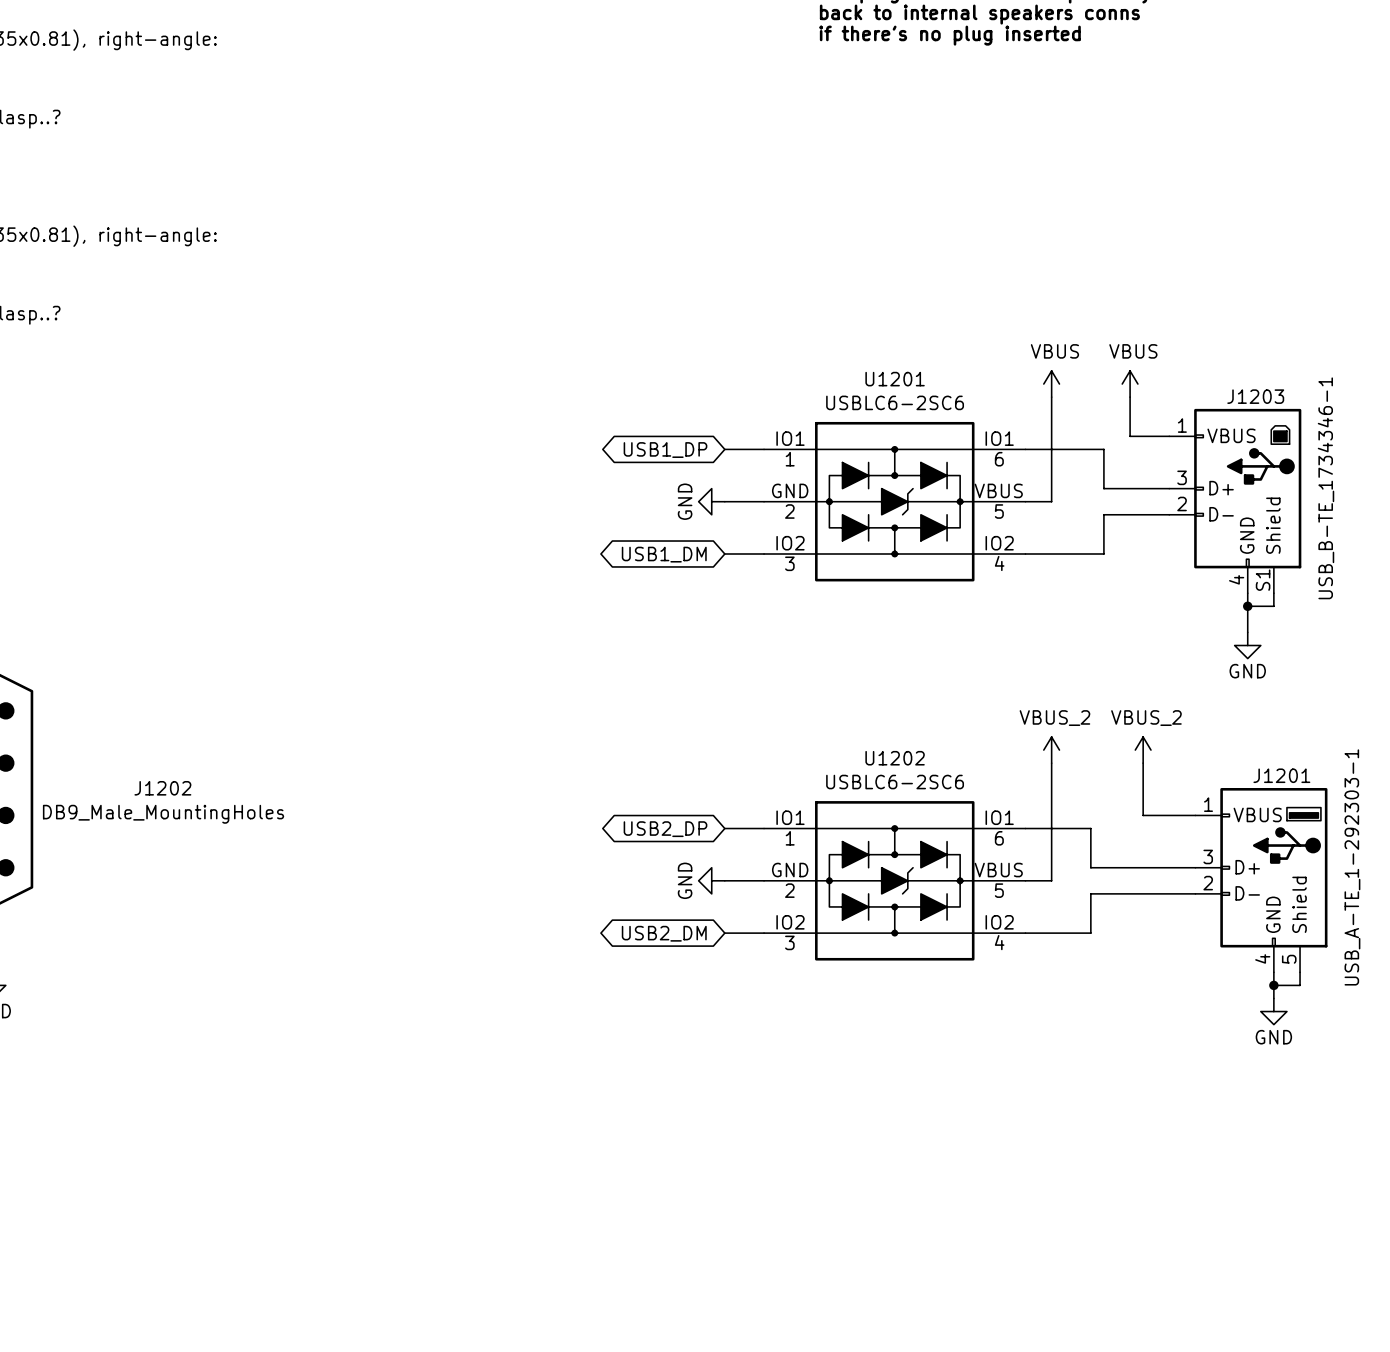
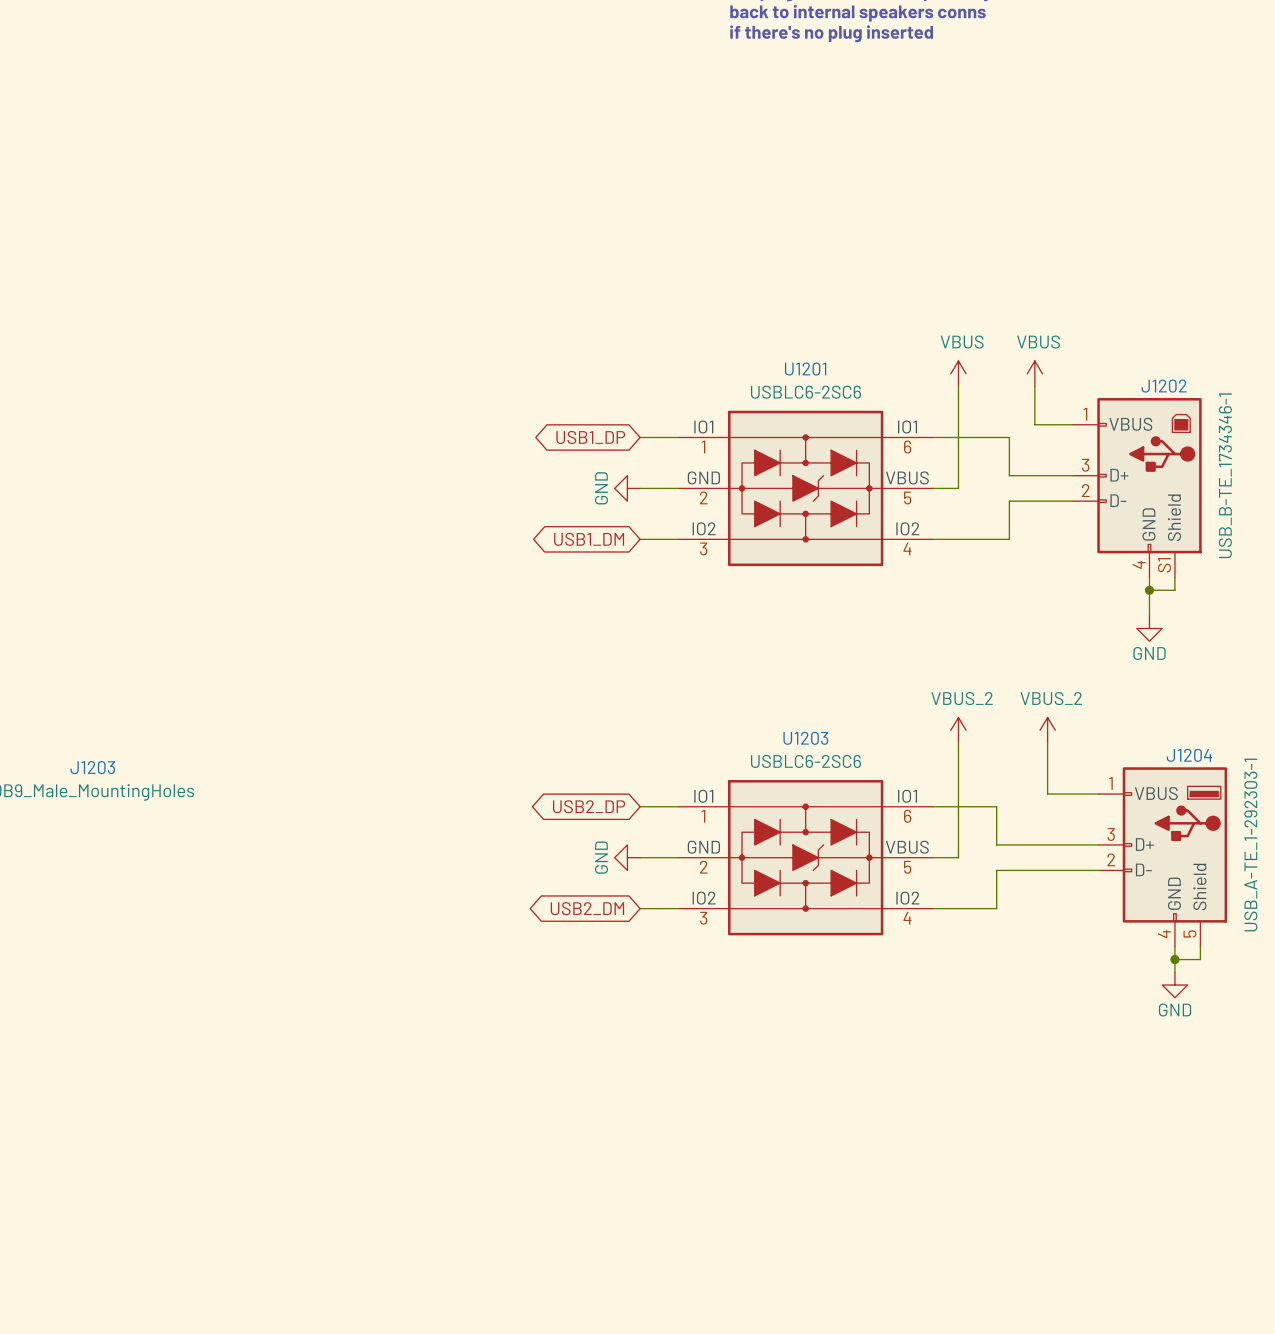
J1203 name: J1203 (1255, 396) -> J1202 (1164, 386)
U1202 name: U1202 (895, 758) -> U1203 (805, 738)
J1201 name: J1201 (1281, 775) -> J1204 (1189, 755)
J1202 name: J1202 (162, 788) -> J1203 (92, 767)

